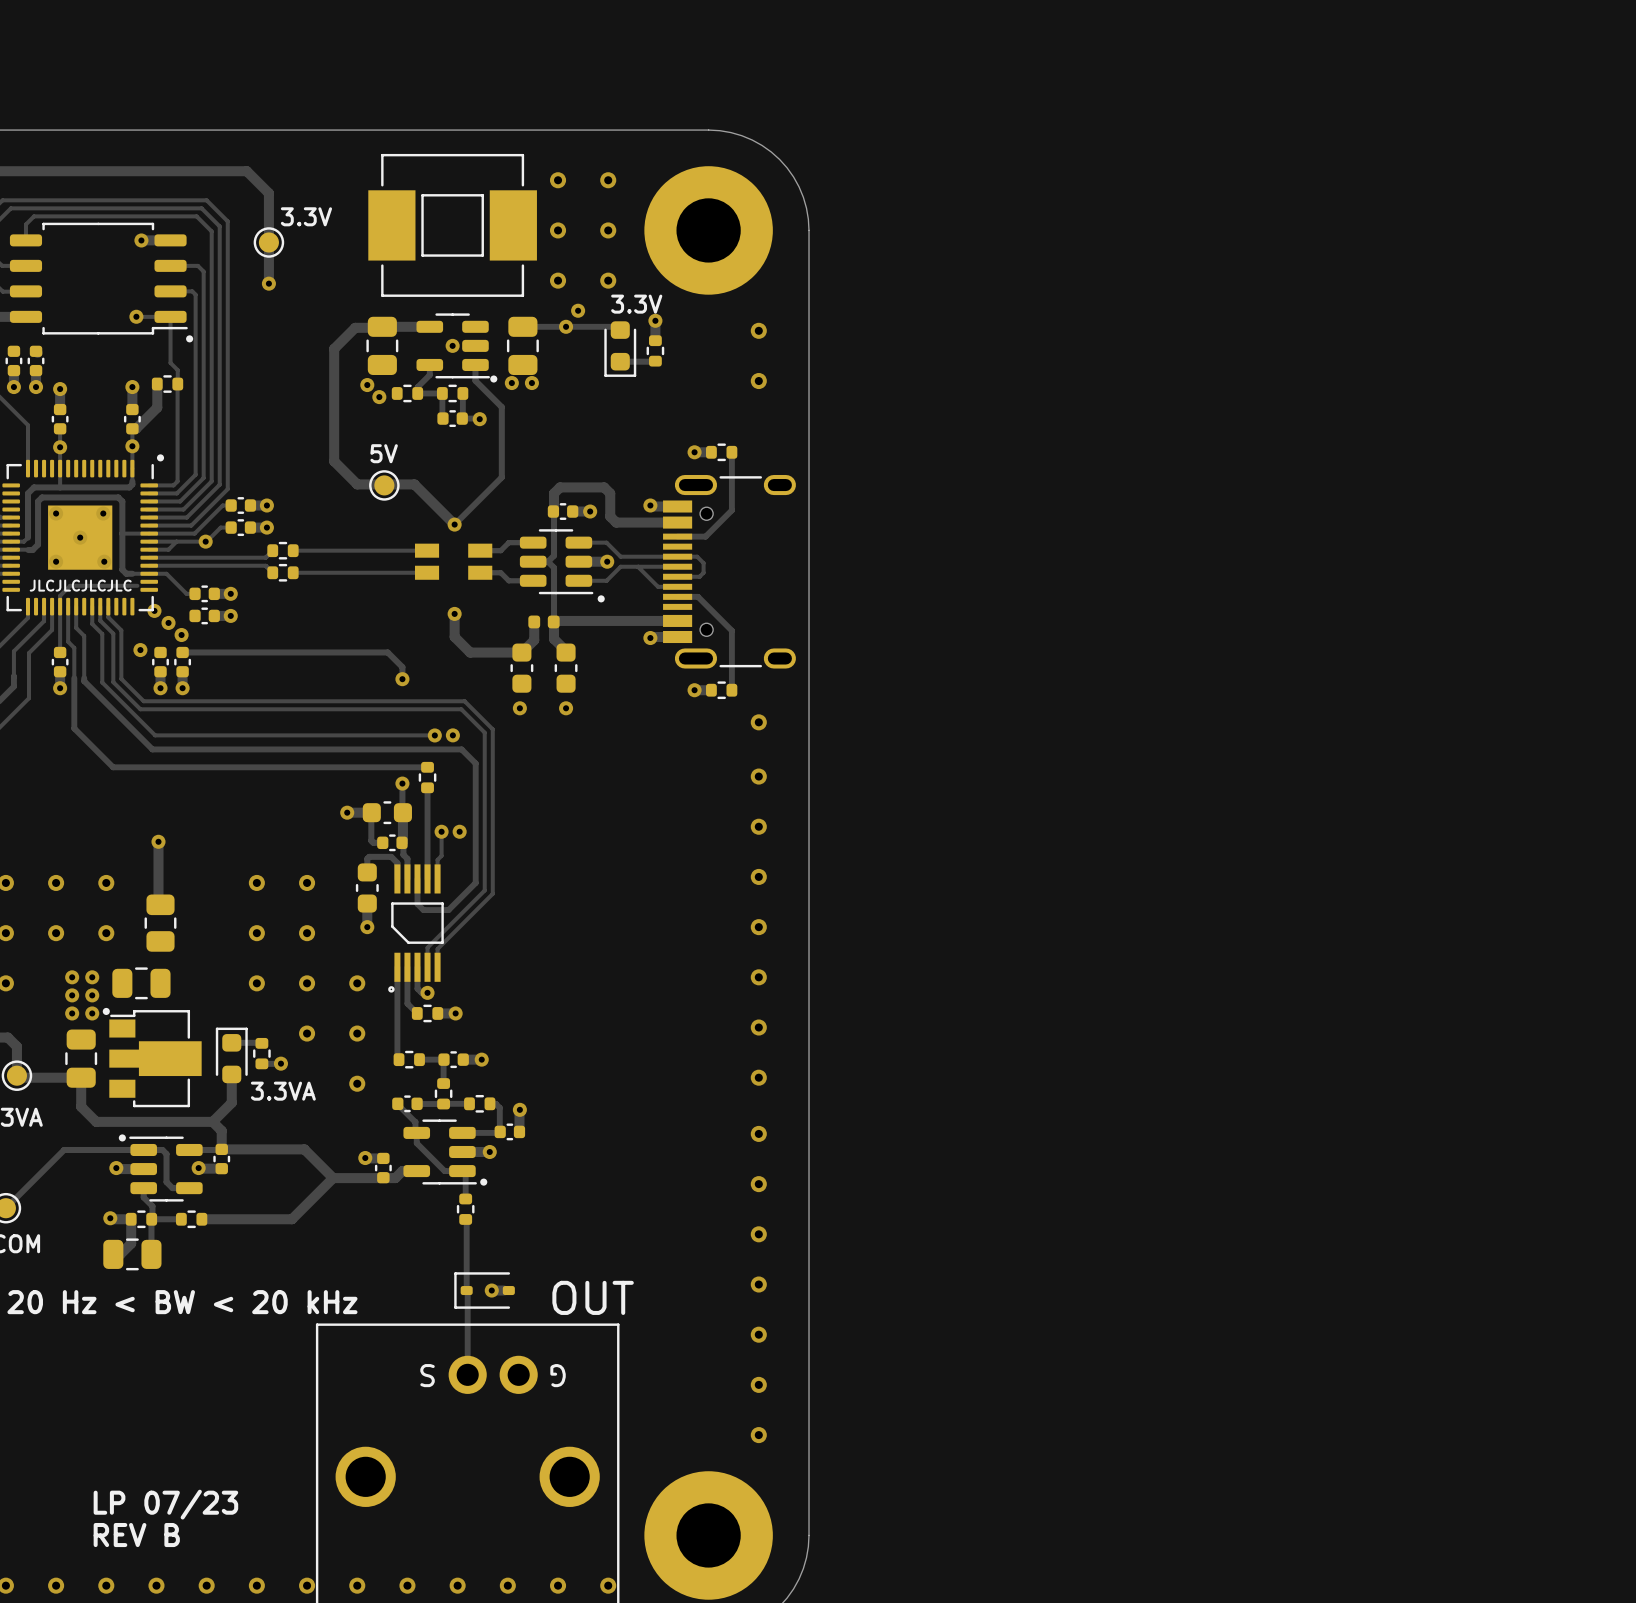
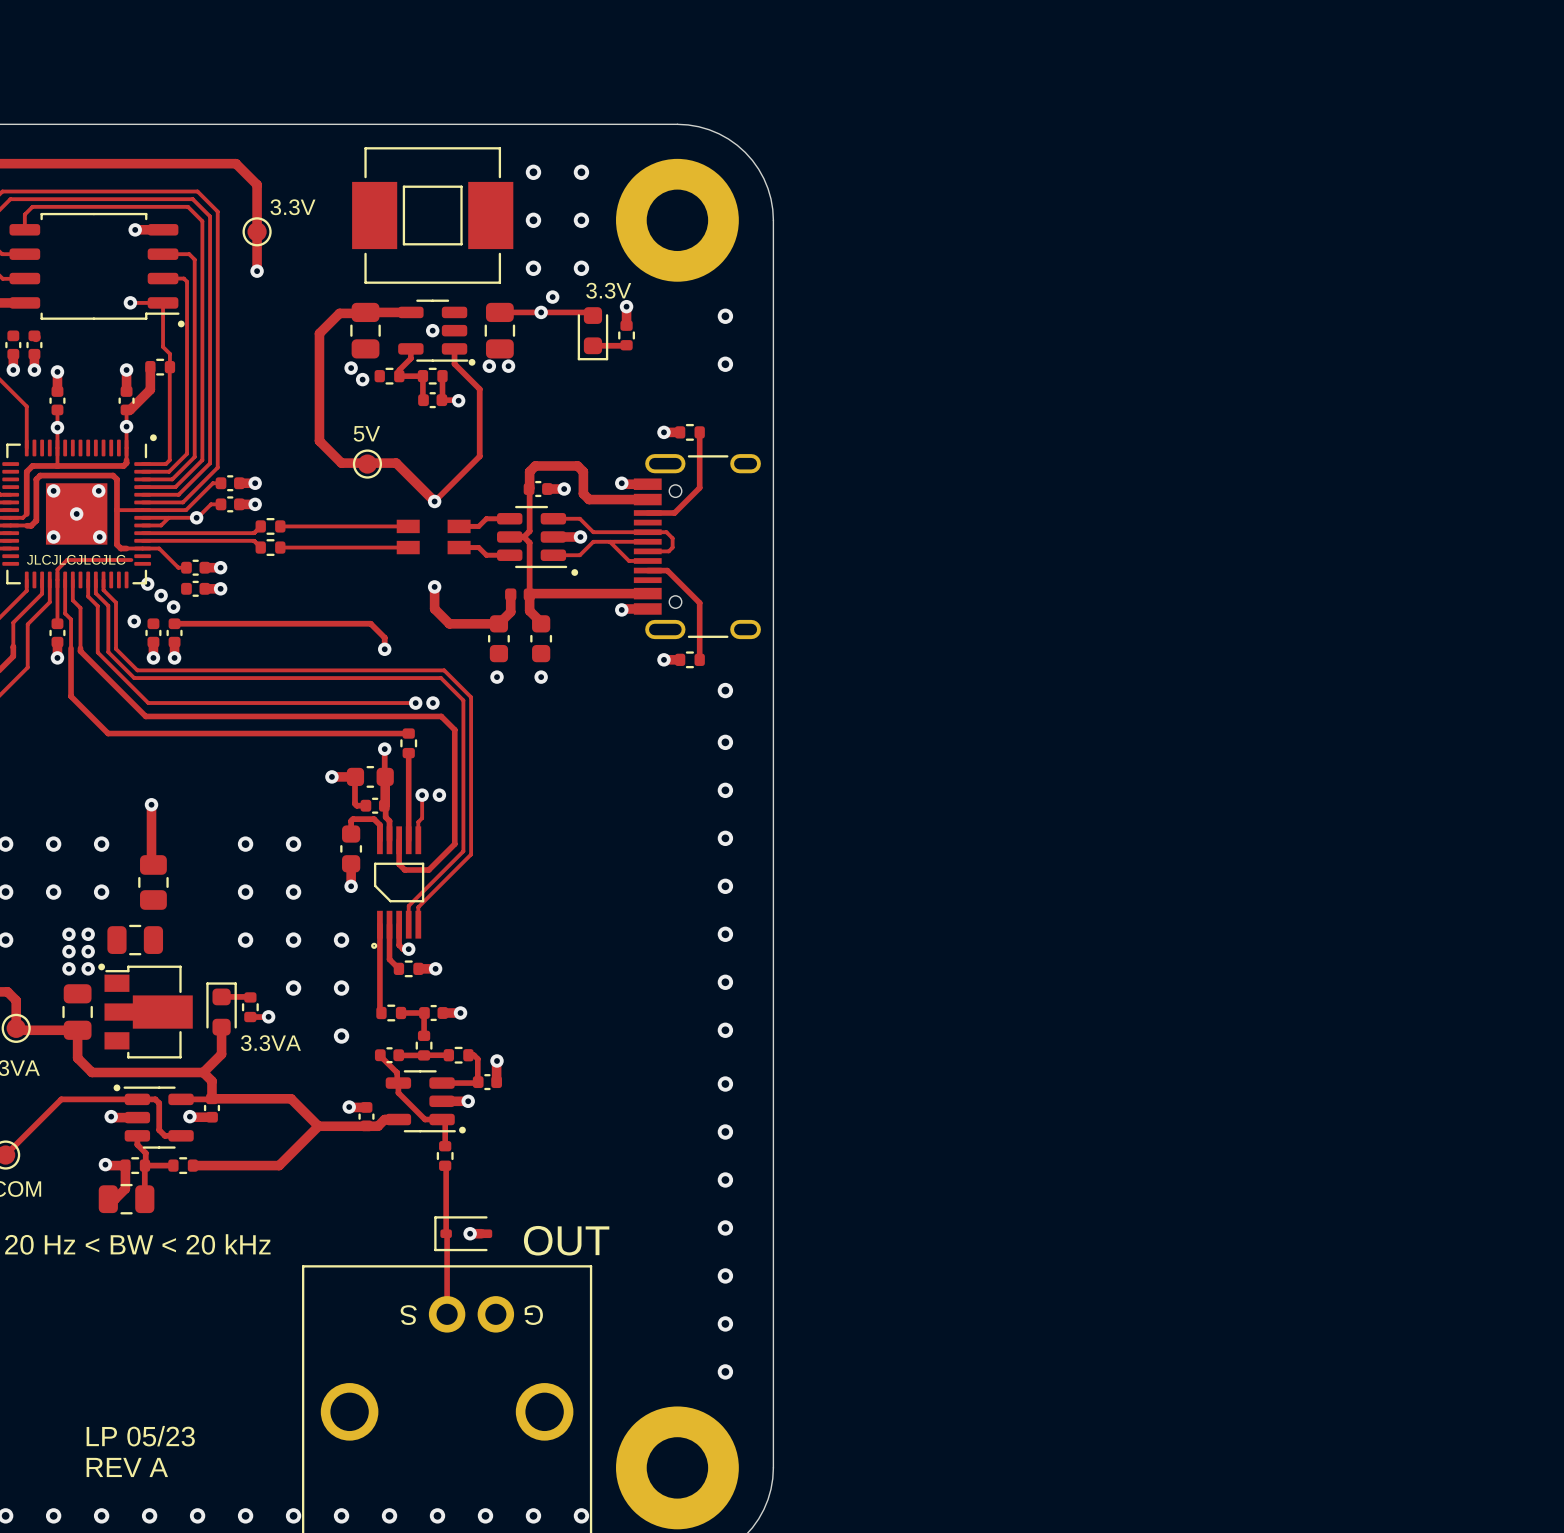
text: LP 07/23 (165, 1504) -> LP 05/23 (140, 1436)
text: REV B (136, 1535) -> REV A (127, 1467)

